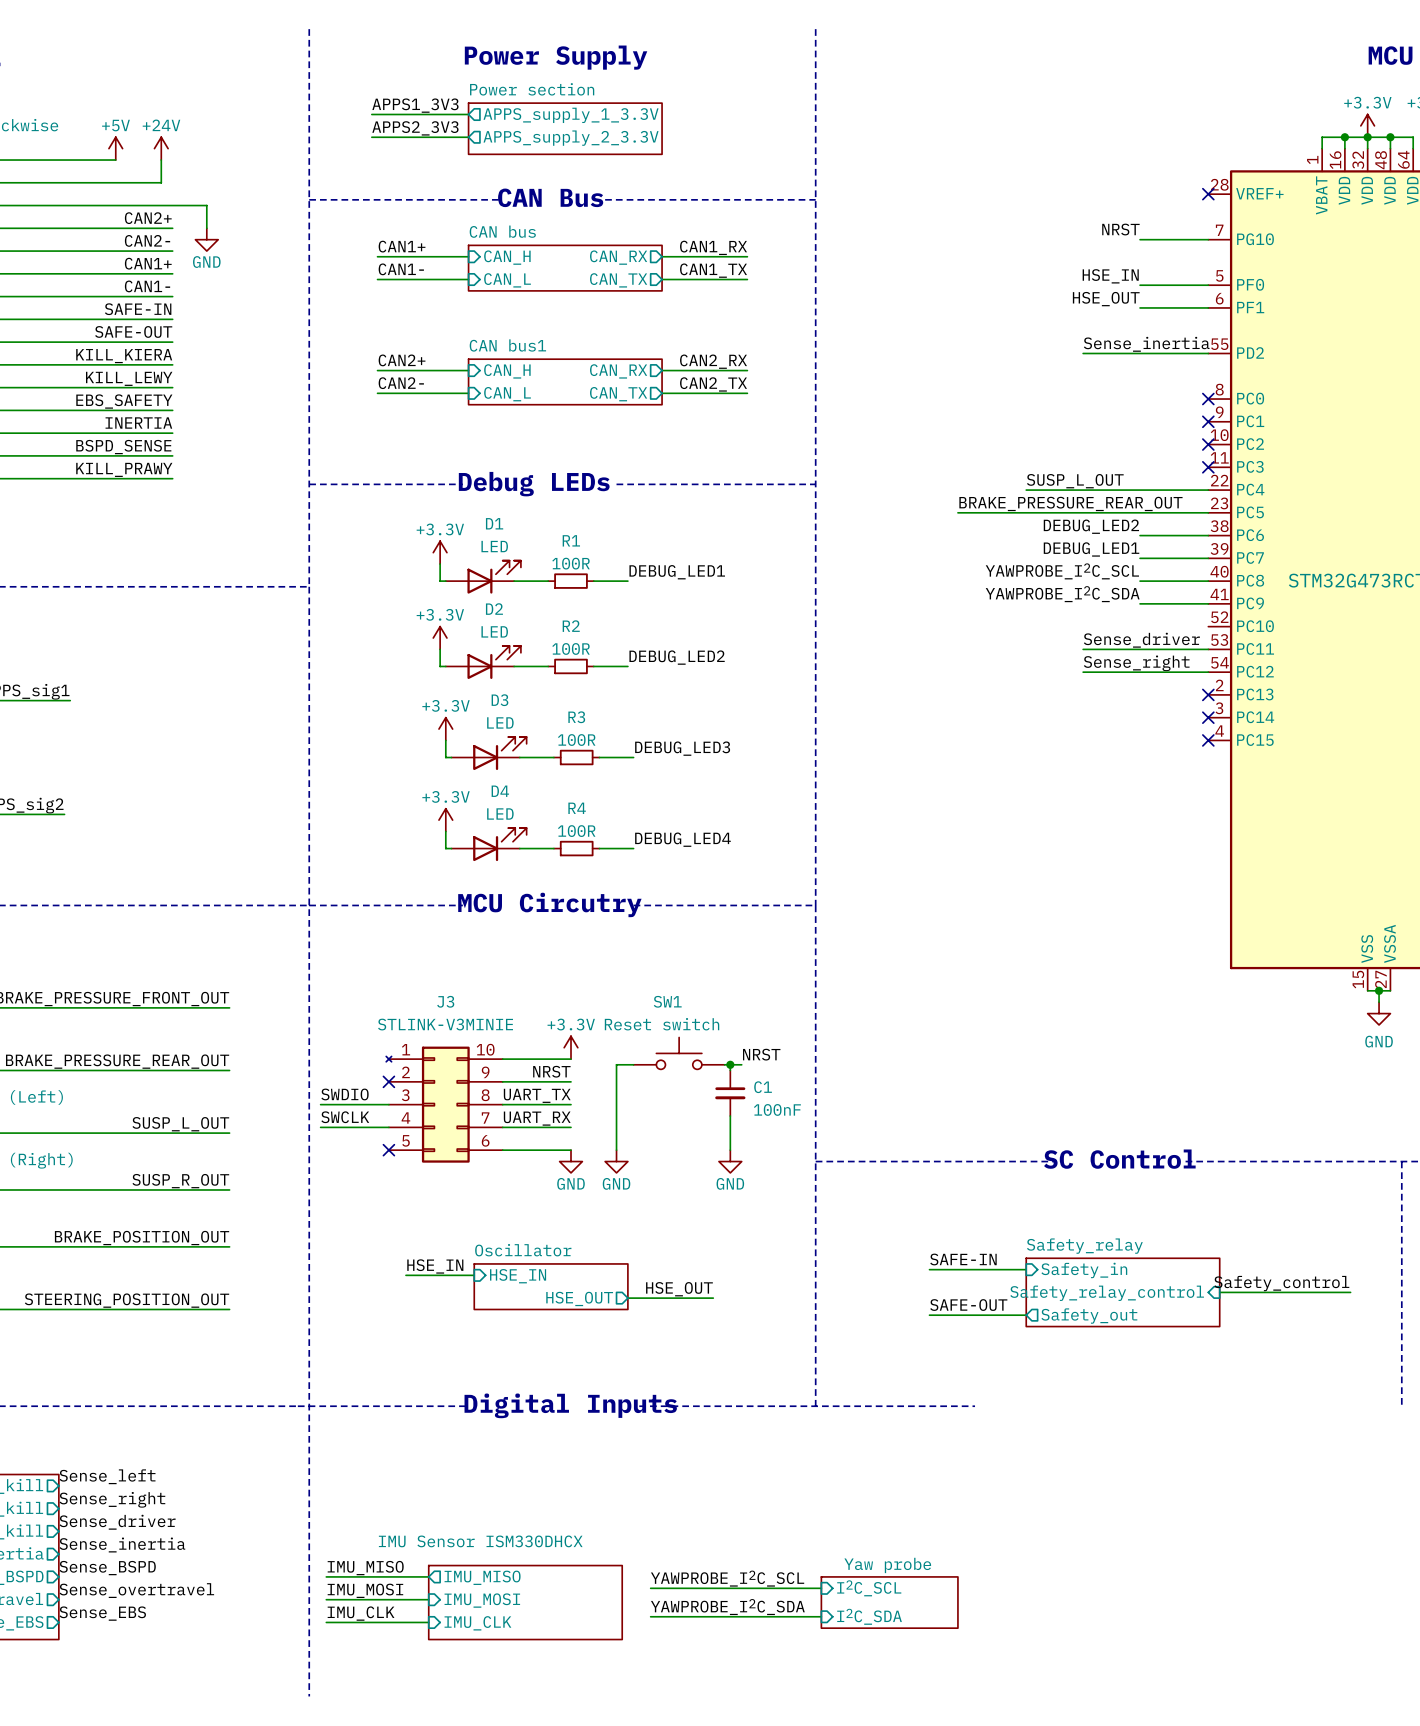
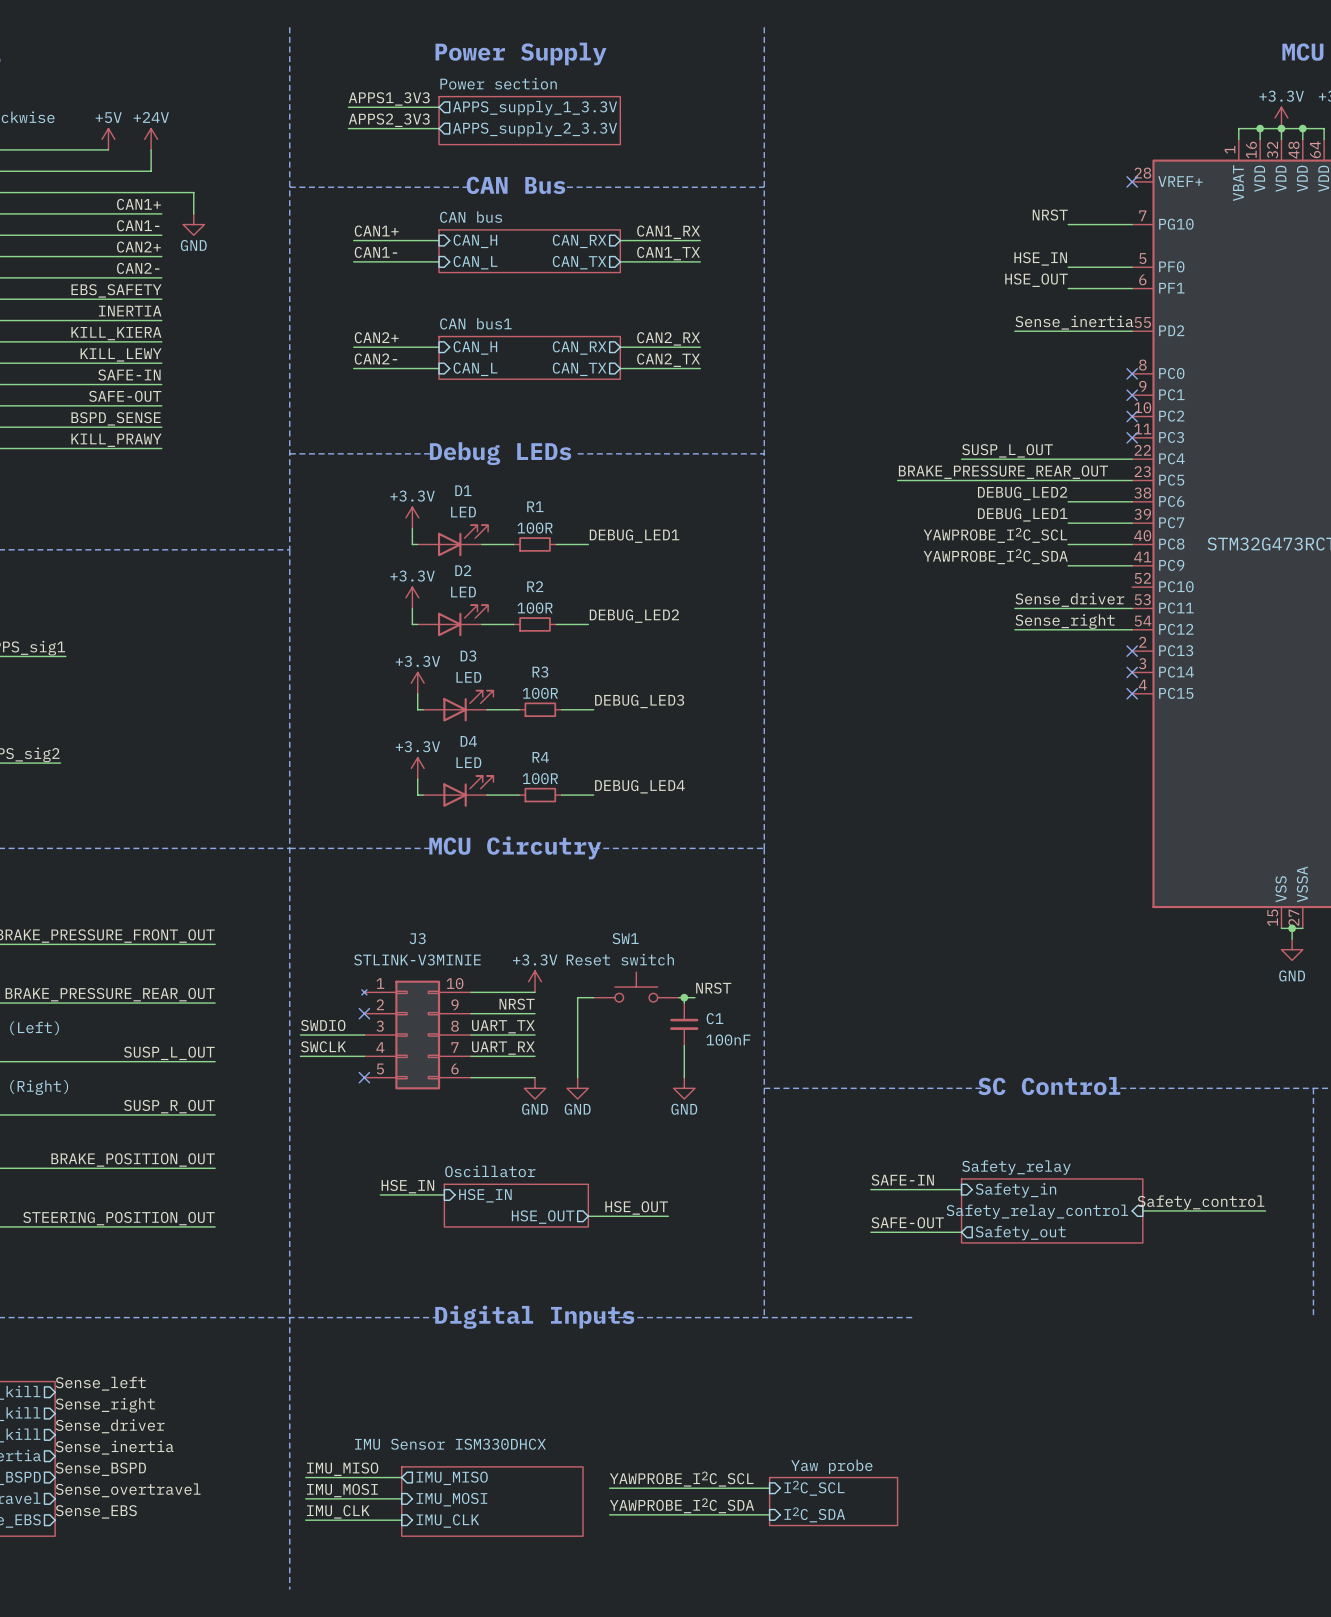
label: CAN2+ (148, 218) -> CAN1+ (138, 204)
label: CAN2- (147, 240) -> CAN1- (138, 225)
label: CAN1+ (148, 263) -> CAN2+ (138, 247)
label: CAN1- (147, 286) -> CAN2- (138, 268)
label: SAFE-IN (138, 309) -> EBS_SAFETY (116, 290)
label: SAFE-OUT (133, 331) -> INERTIA (130, 311)
label: EBS_SAFETY (124, 401) -> SAFE-IN (129, 375)
label: INERTIA (138, 423) -> SAFE-OUT (125, 396)

